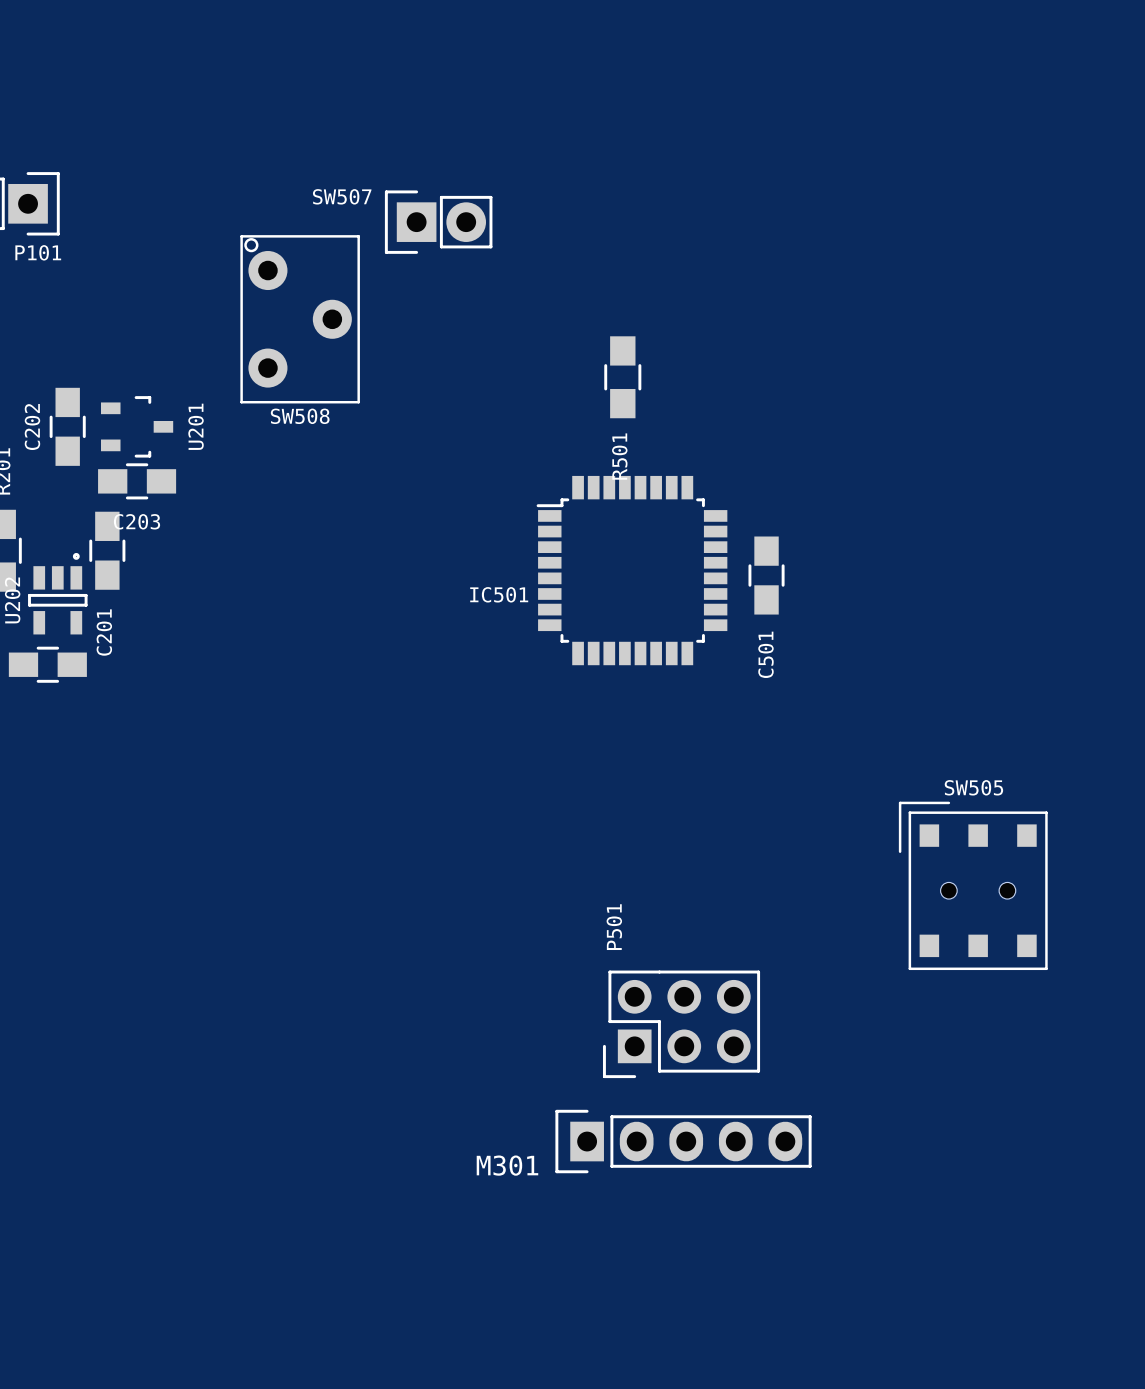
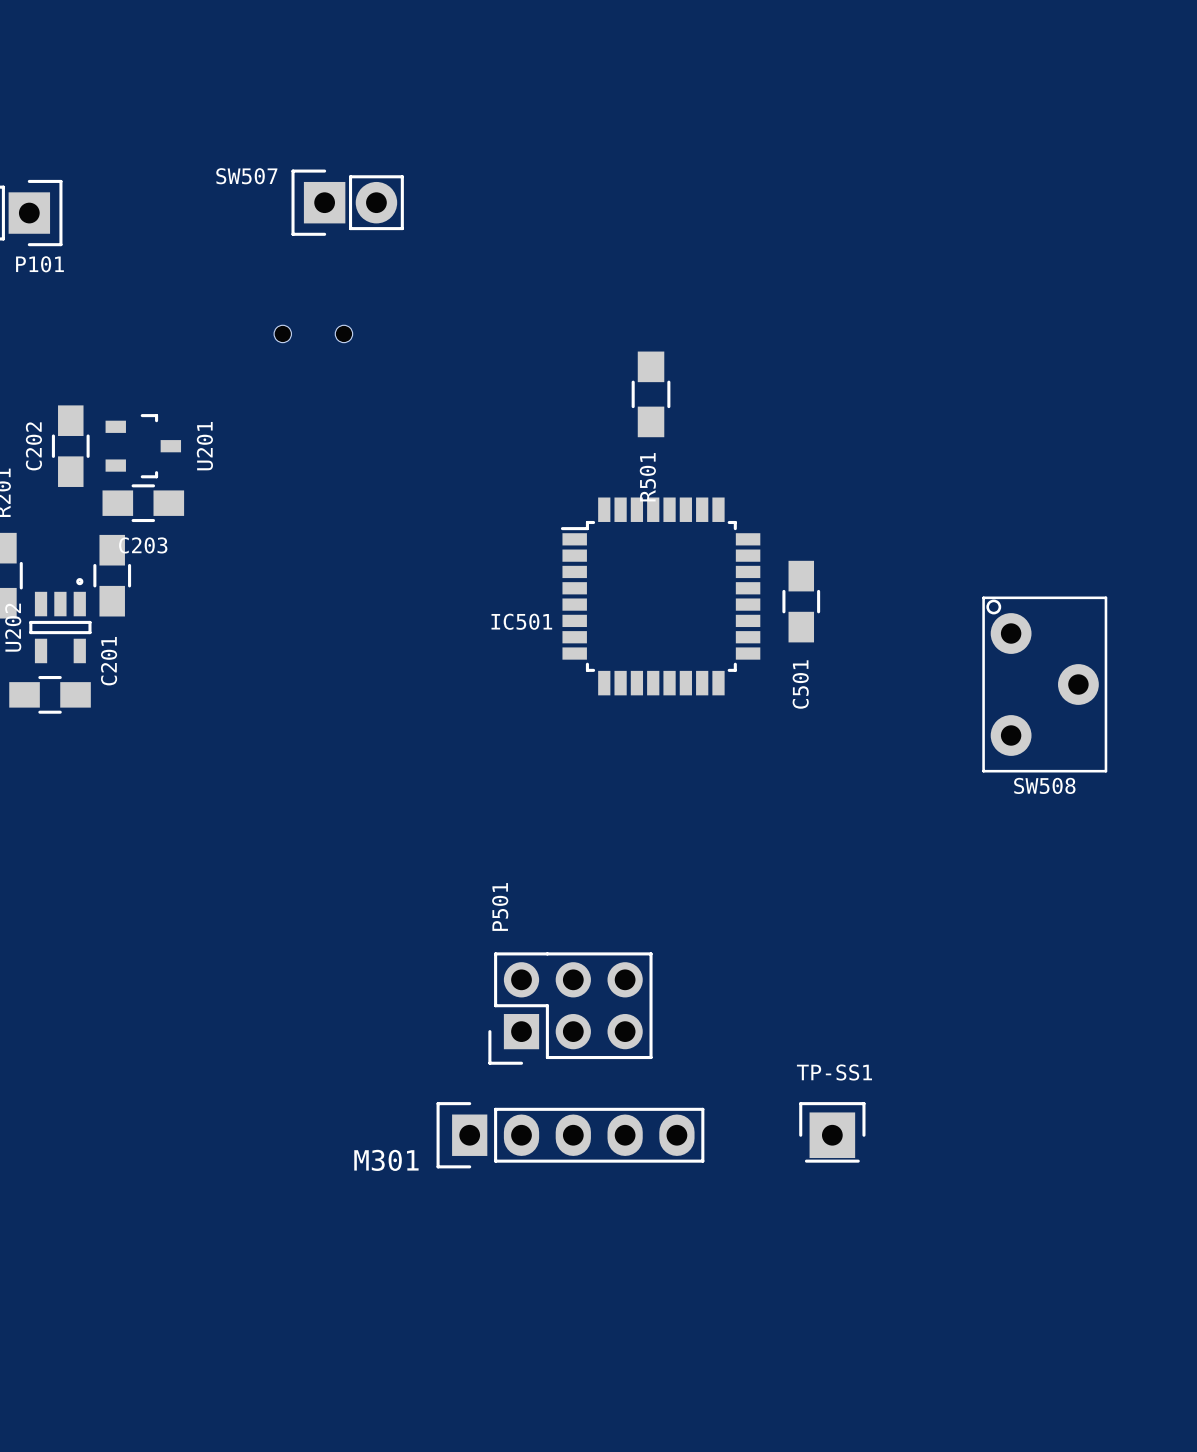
SW507 position: (438, 222) -> (347, 202)
part: none -> (313, 333)
SW508 position: (300, 319) -> (1044, 684)
SW505: (973, 885) -> none
P501 position: (681, 1024) -> (570, 1008)
TP-SS1: none -> (832, 1132)
M301 position: (683, 1141) -> (570, 1135)

